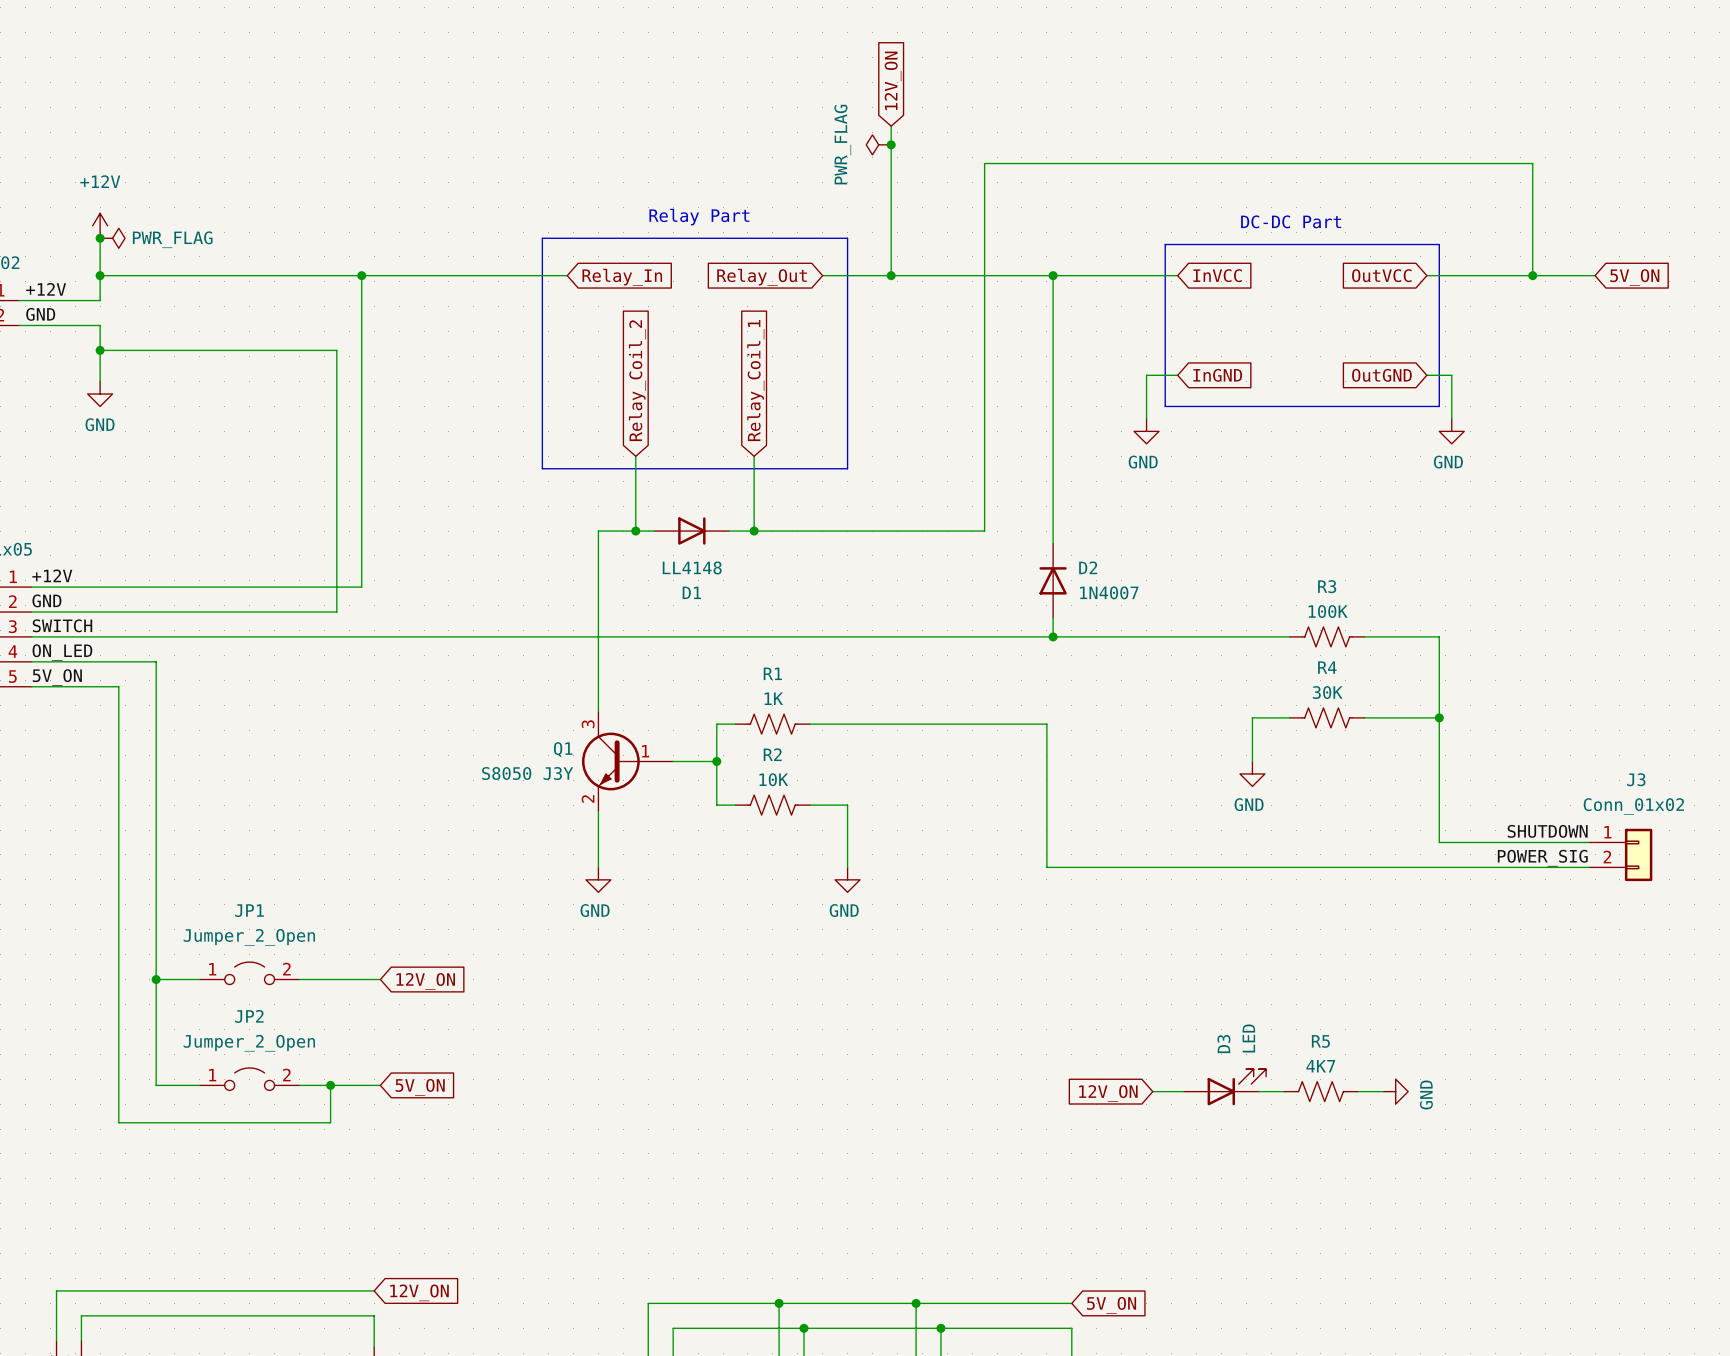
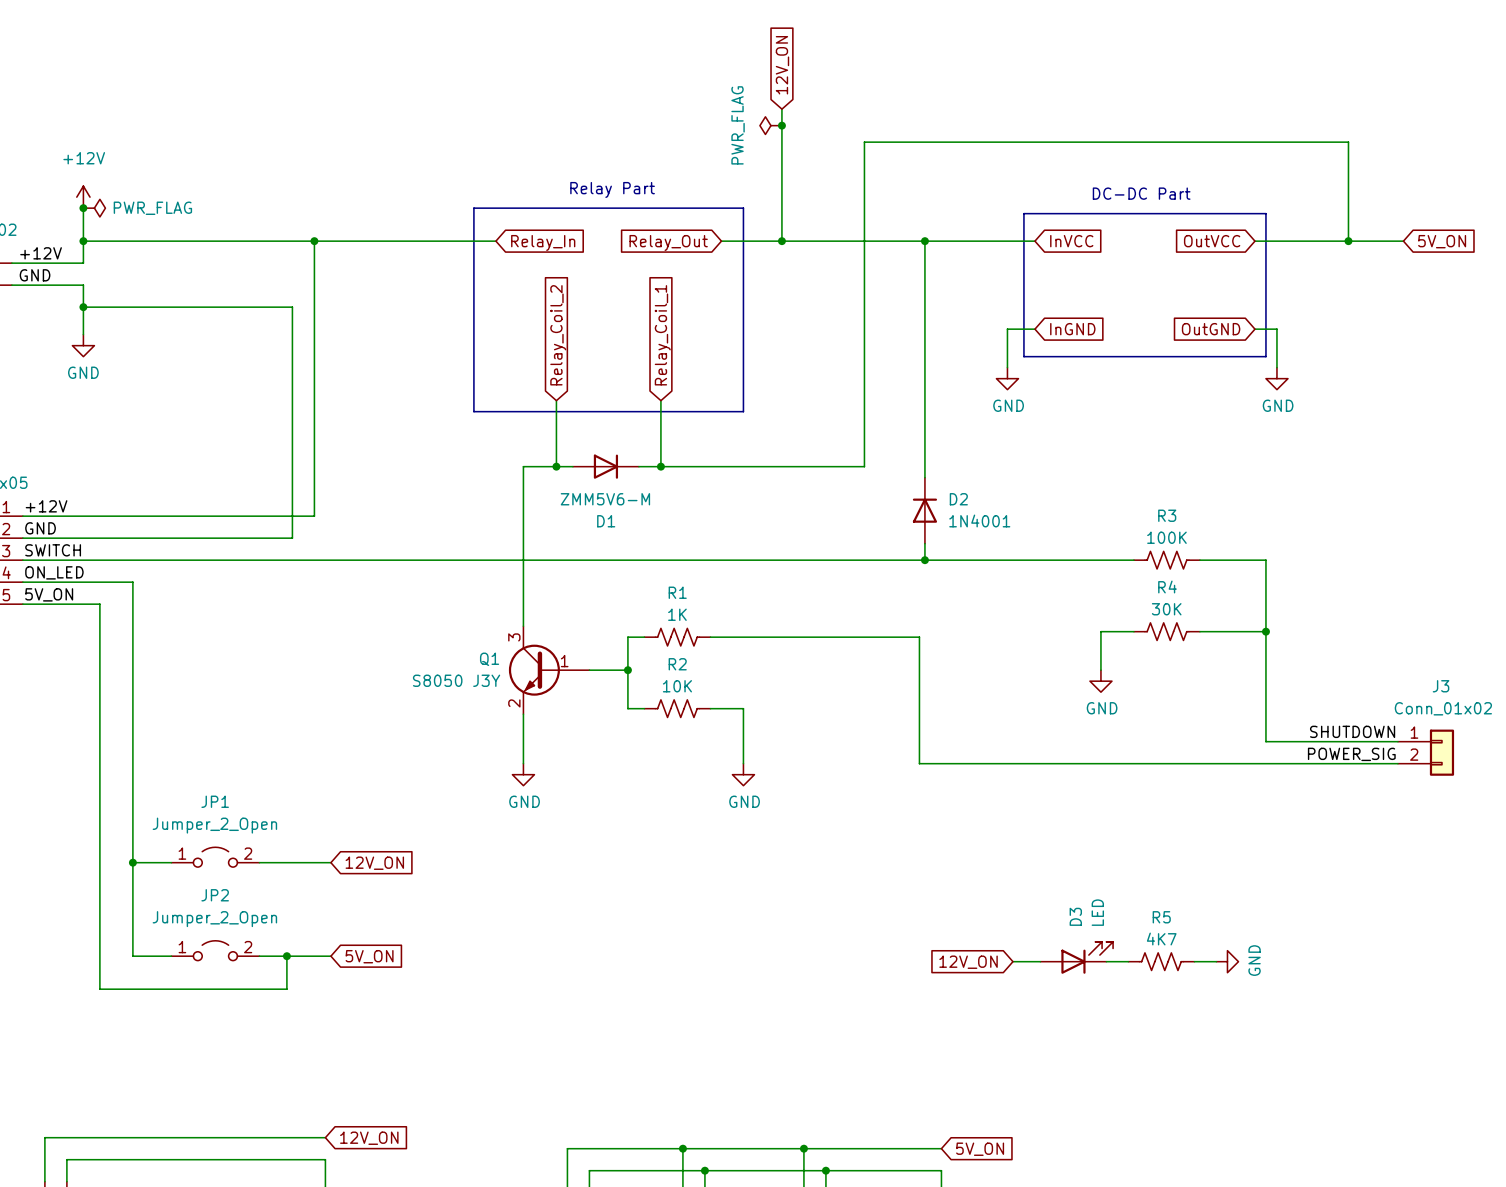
D1 value: LL4148 (692, 567) -> ZMM5V6-M (605, 499)
D2 value: 1N4007 (1109, 592) -> 1N4001 (979, 520)

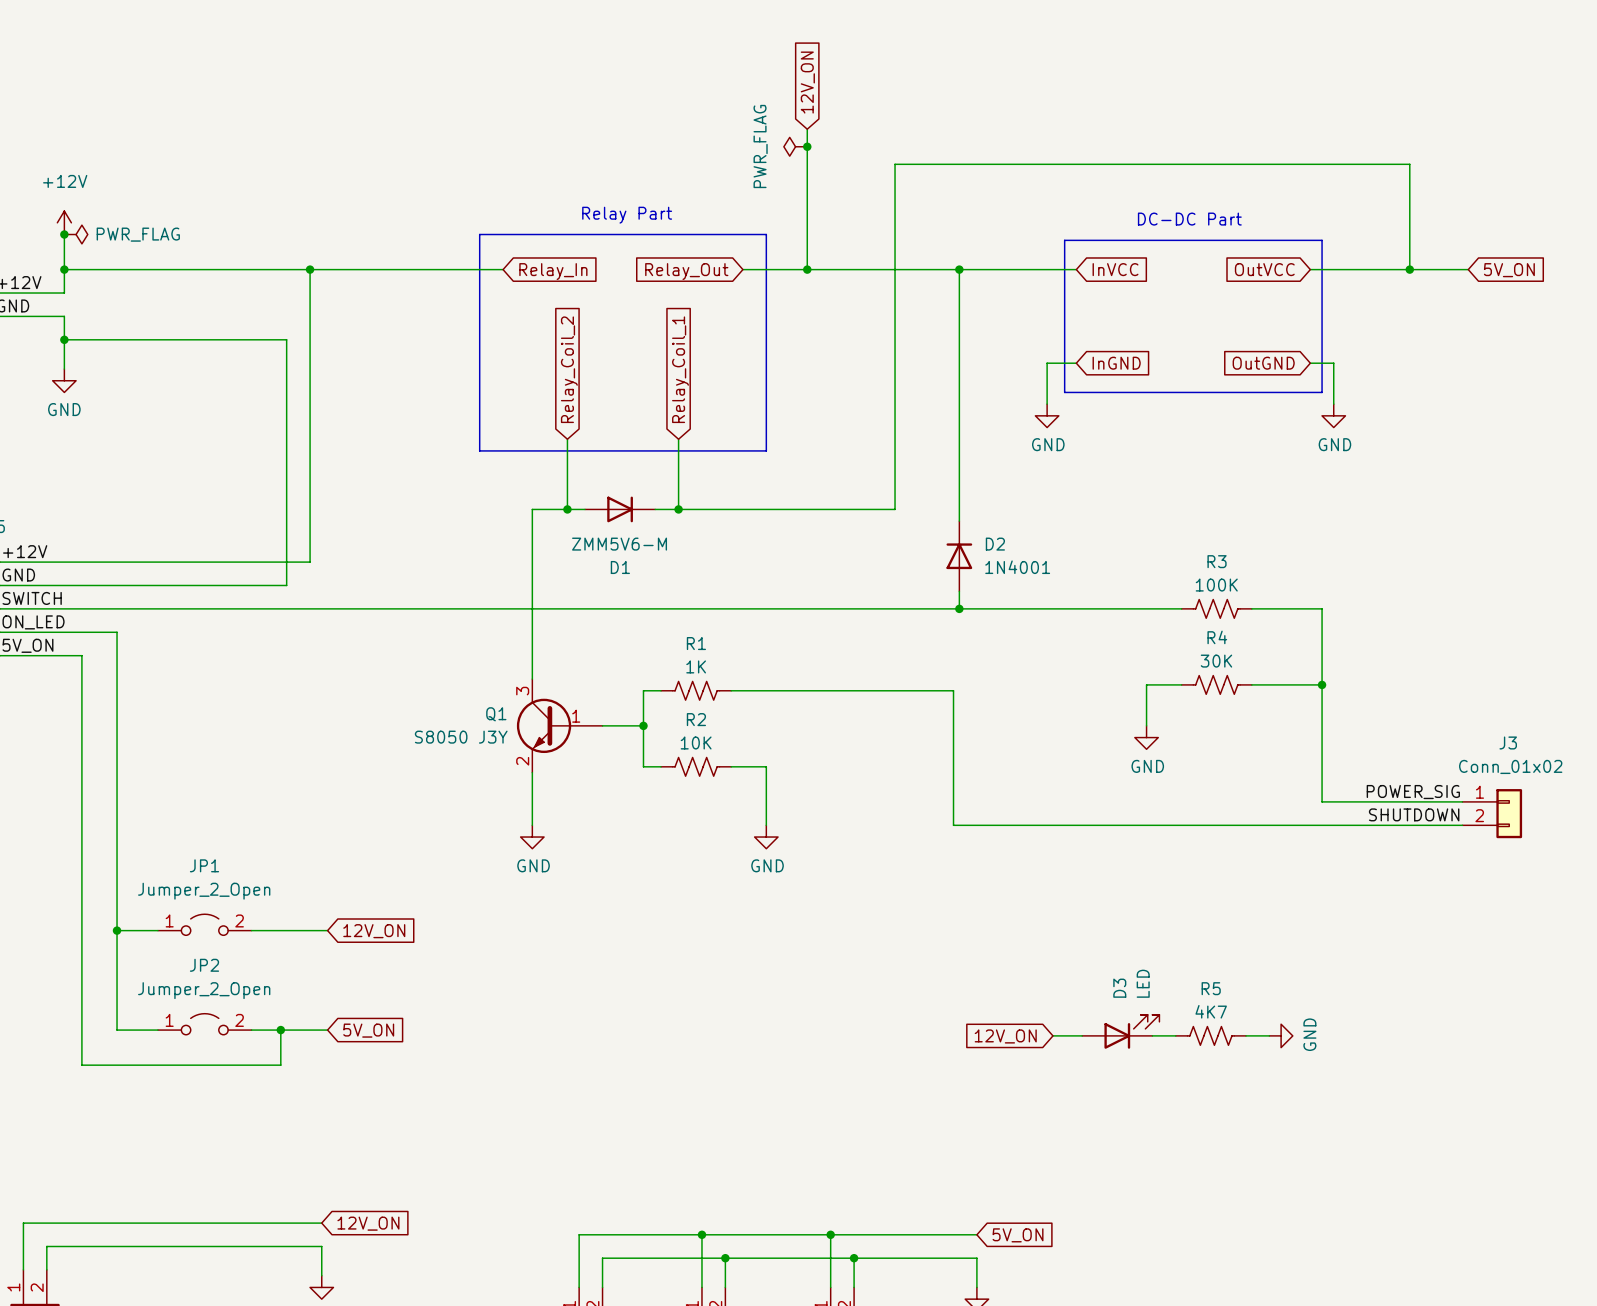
label: SHUTDOWN (1352, 731) -> POWER_SIG (1413, 792)
label: POWER_SIG (1351, 754) -> SHUTDOWN (1414, 814)

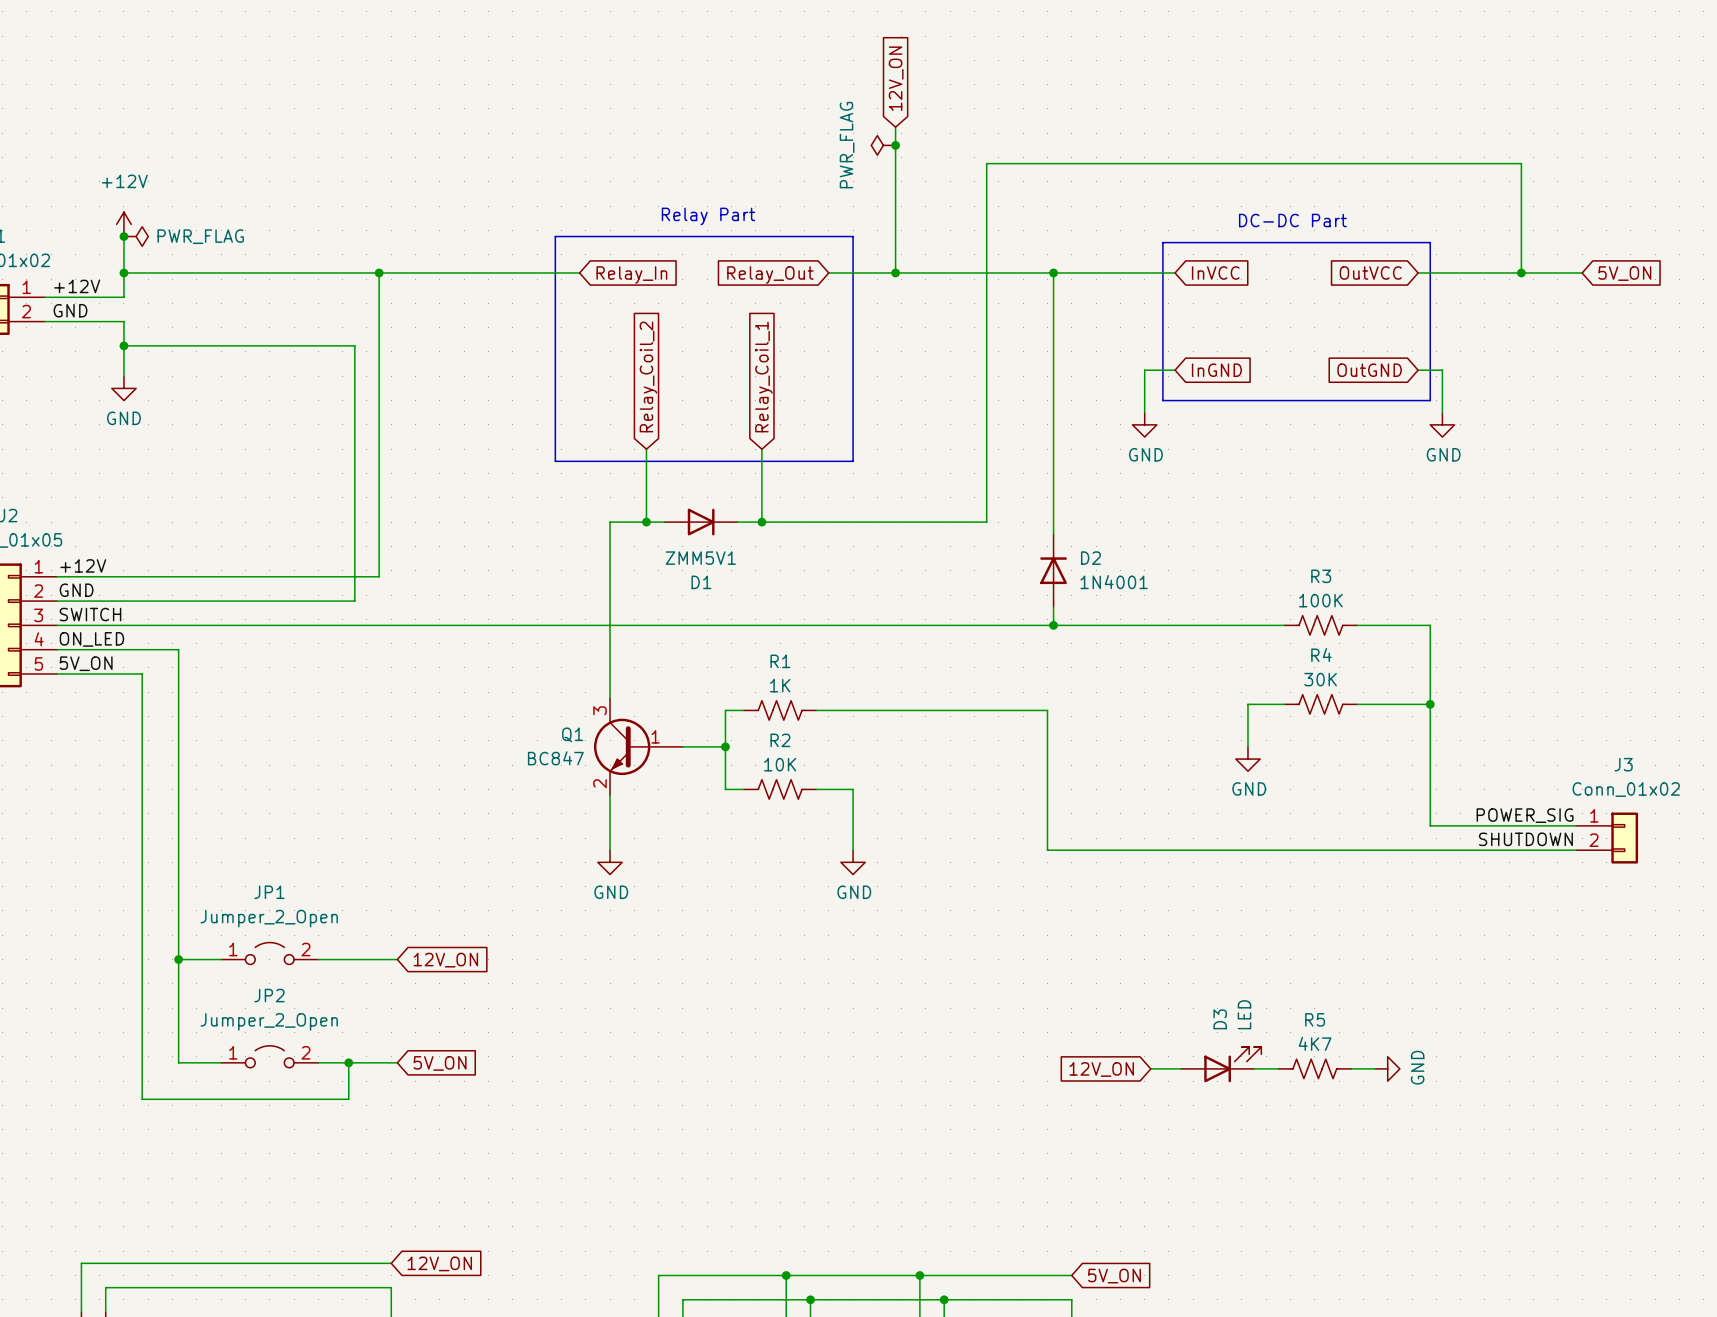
D1 value: ZMM5V6-M (619, 544) -> ZMM5V1 (700, 558)
Q1 value: S8050 J3Y (461, 737) -> BC847 (555, 758)

